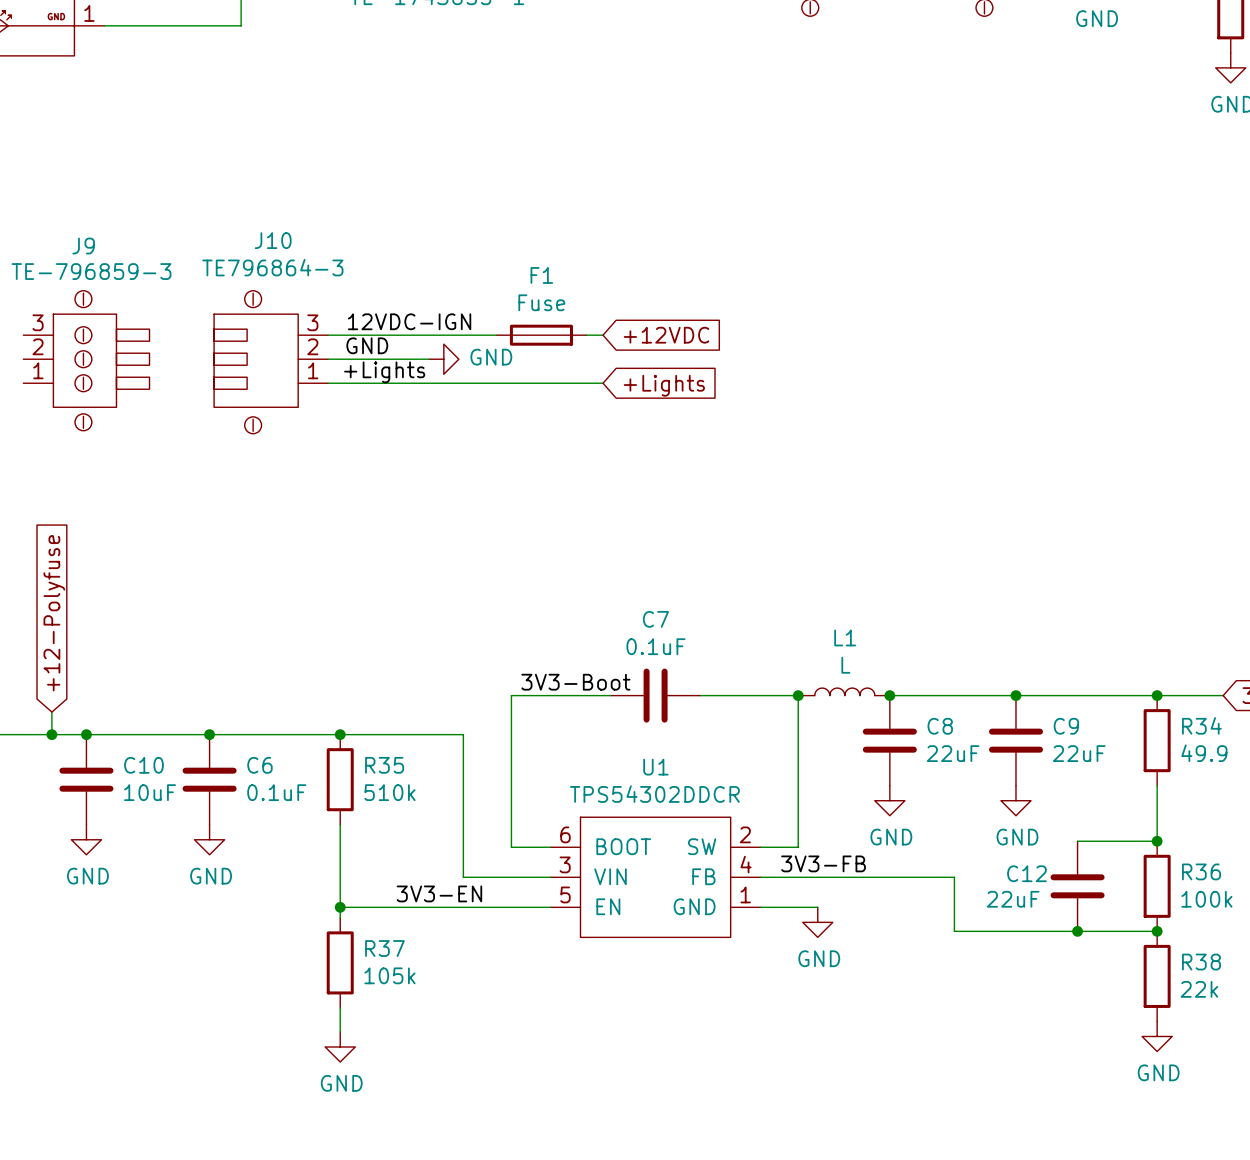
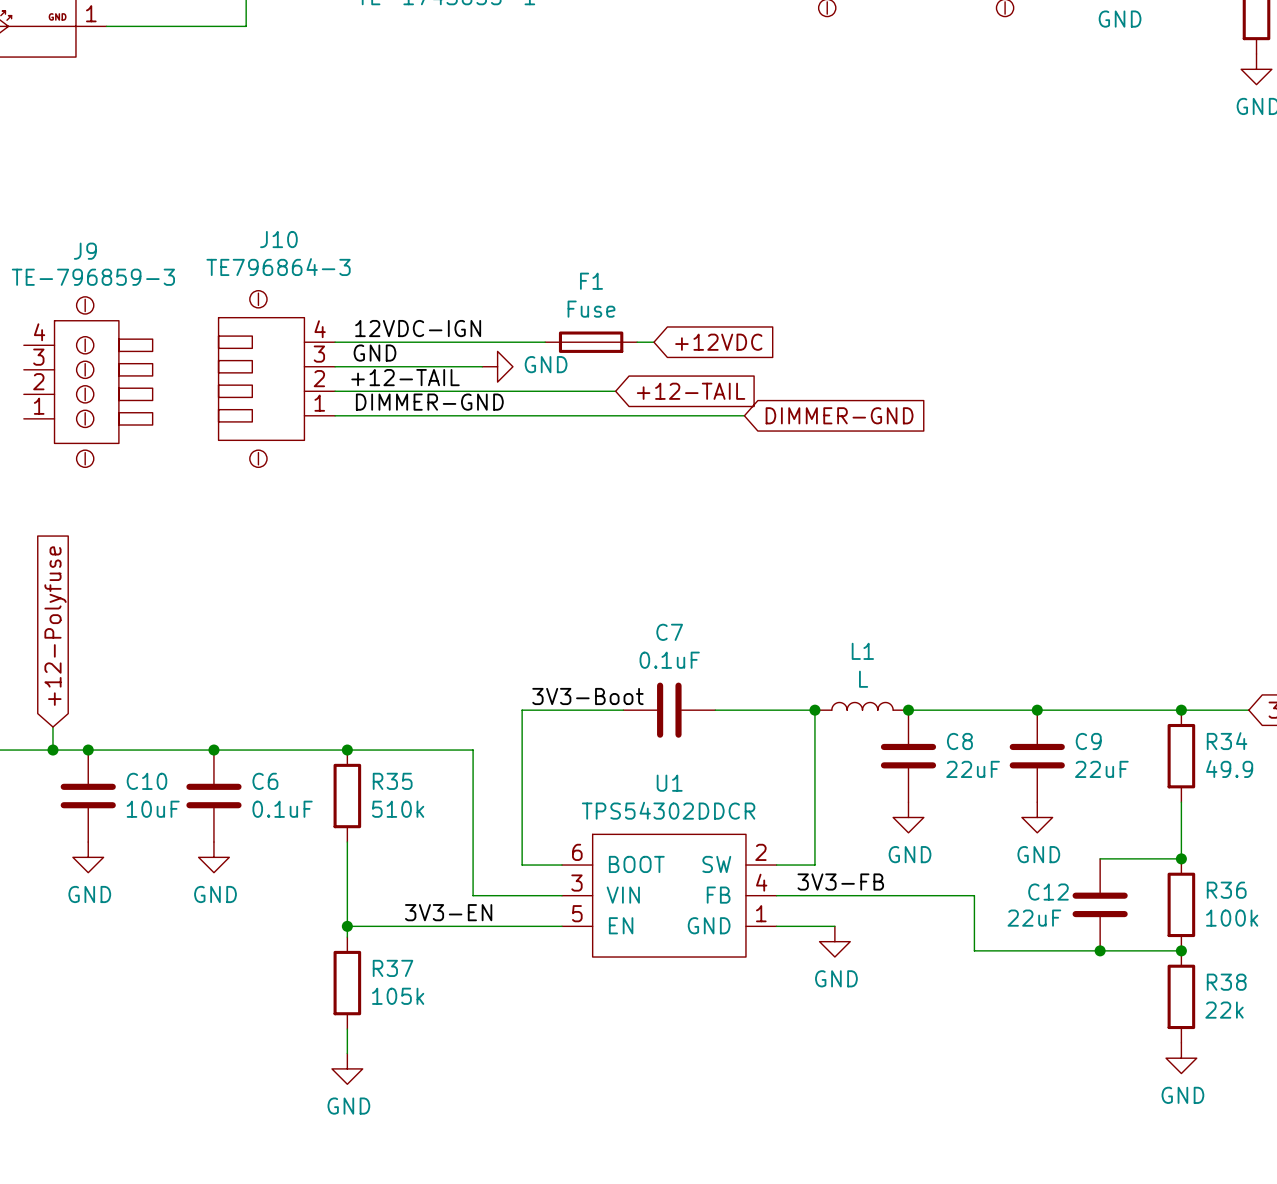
J9 symbol: [23, 290, 150, 431] -> [23, 296, 153, 468]
J10 symbol: [214, 290, 329, 434] -> [218, 290, 336, 468]
F1 position: (541, 335) -> (591, 342)
global label position: +12VDC (666, 335) -> +12VDC (718, 342)
wire: none -> (437, 366) (482, 366)
power symbol position: GND (443, 359) -> GND (497, 366)
label: +Lights (384, 372) -> +12-TAIL (405, 377)
global label: +Lights (664, 385) -> +12-TAIL (691, 391)
label: none -> DIMMER-GND (429, 402)
wire: none -> (335, 415) (744, 415)
global label: none -> DIMMER-GND (839, 415)

